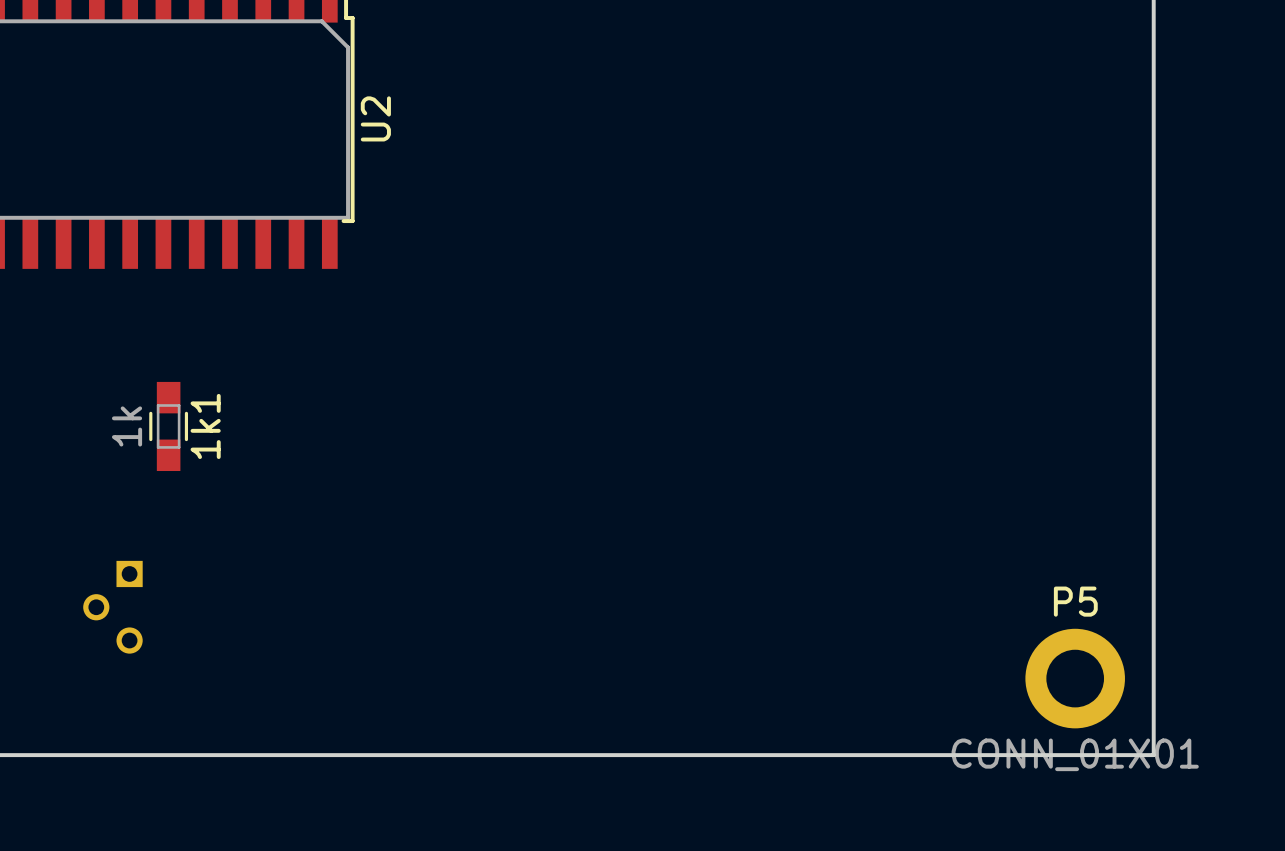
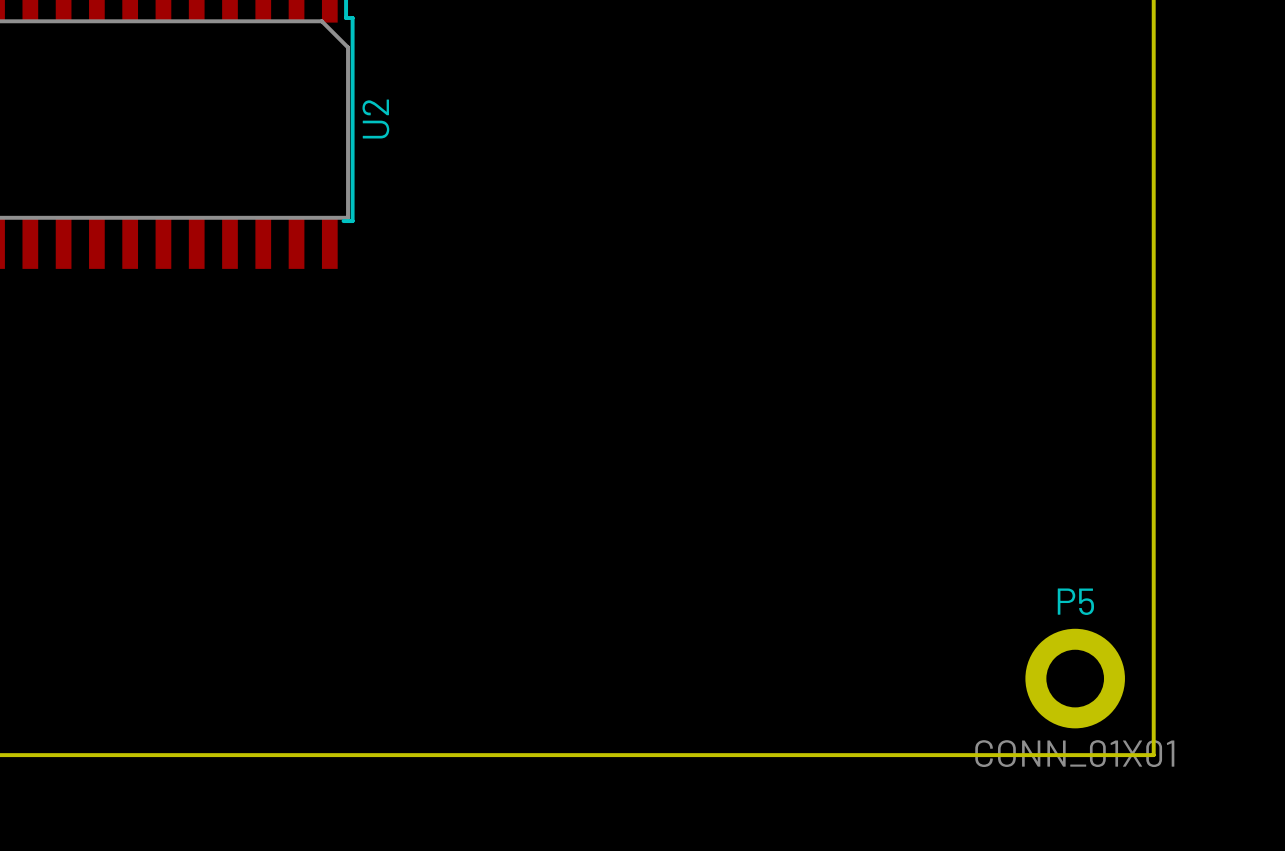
1k1: 1k (168, 426) -> none
part: (112, 607) -> none

